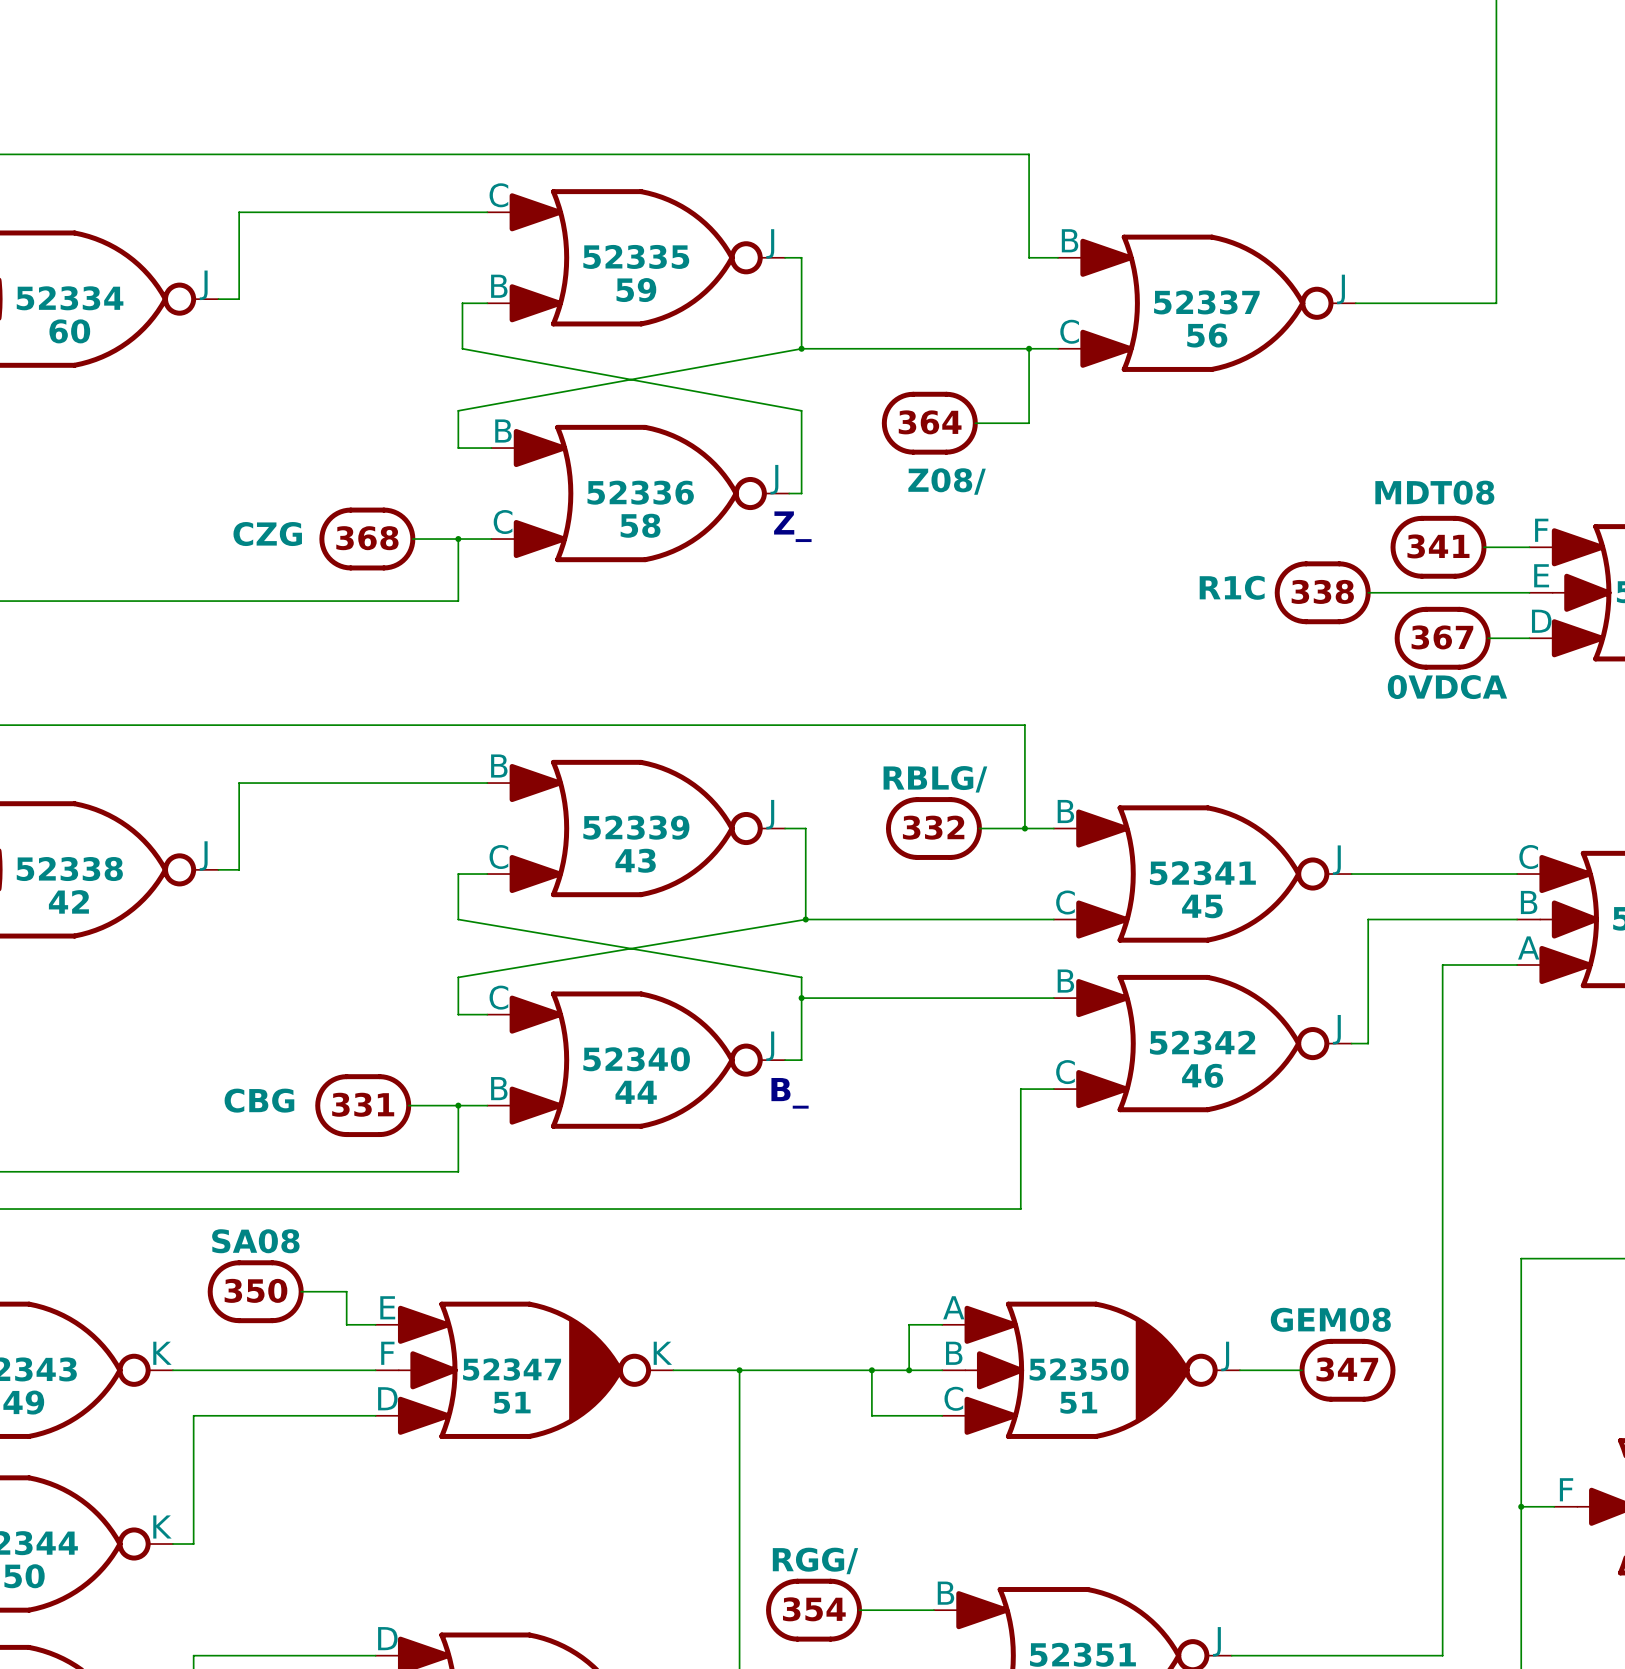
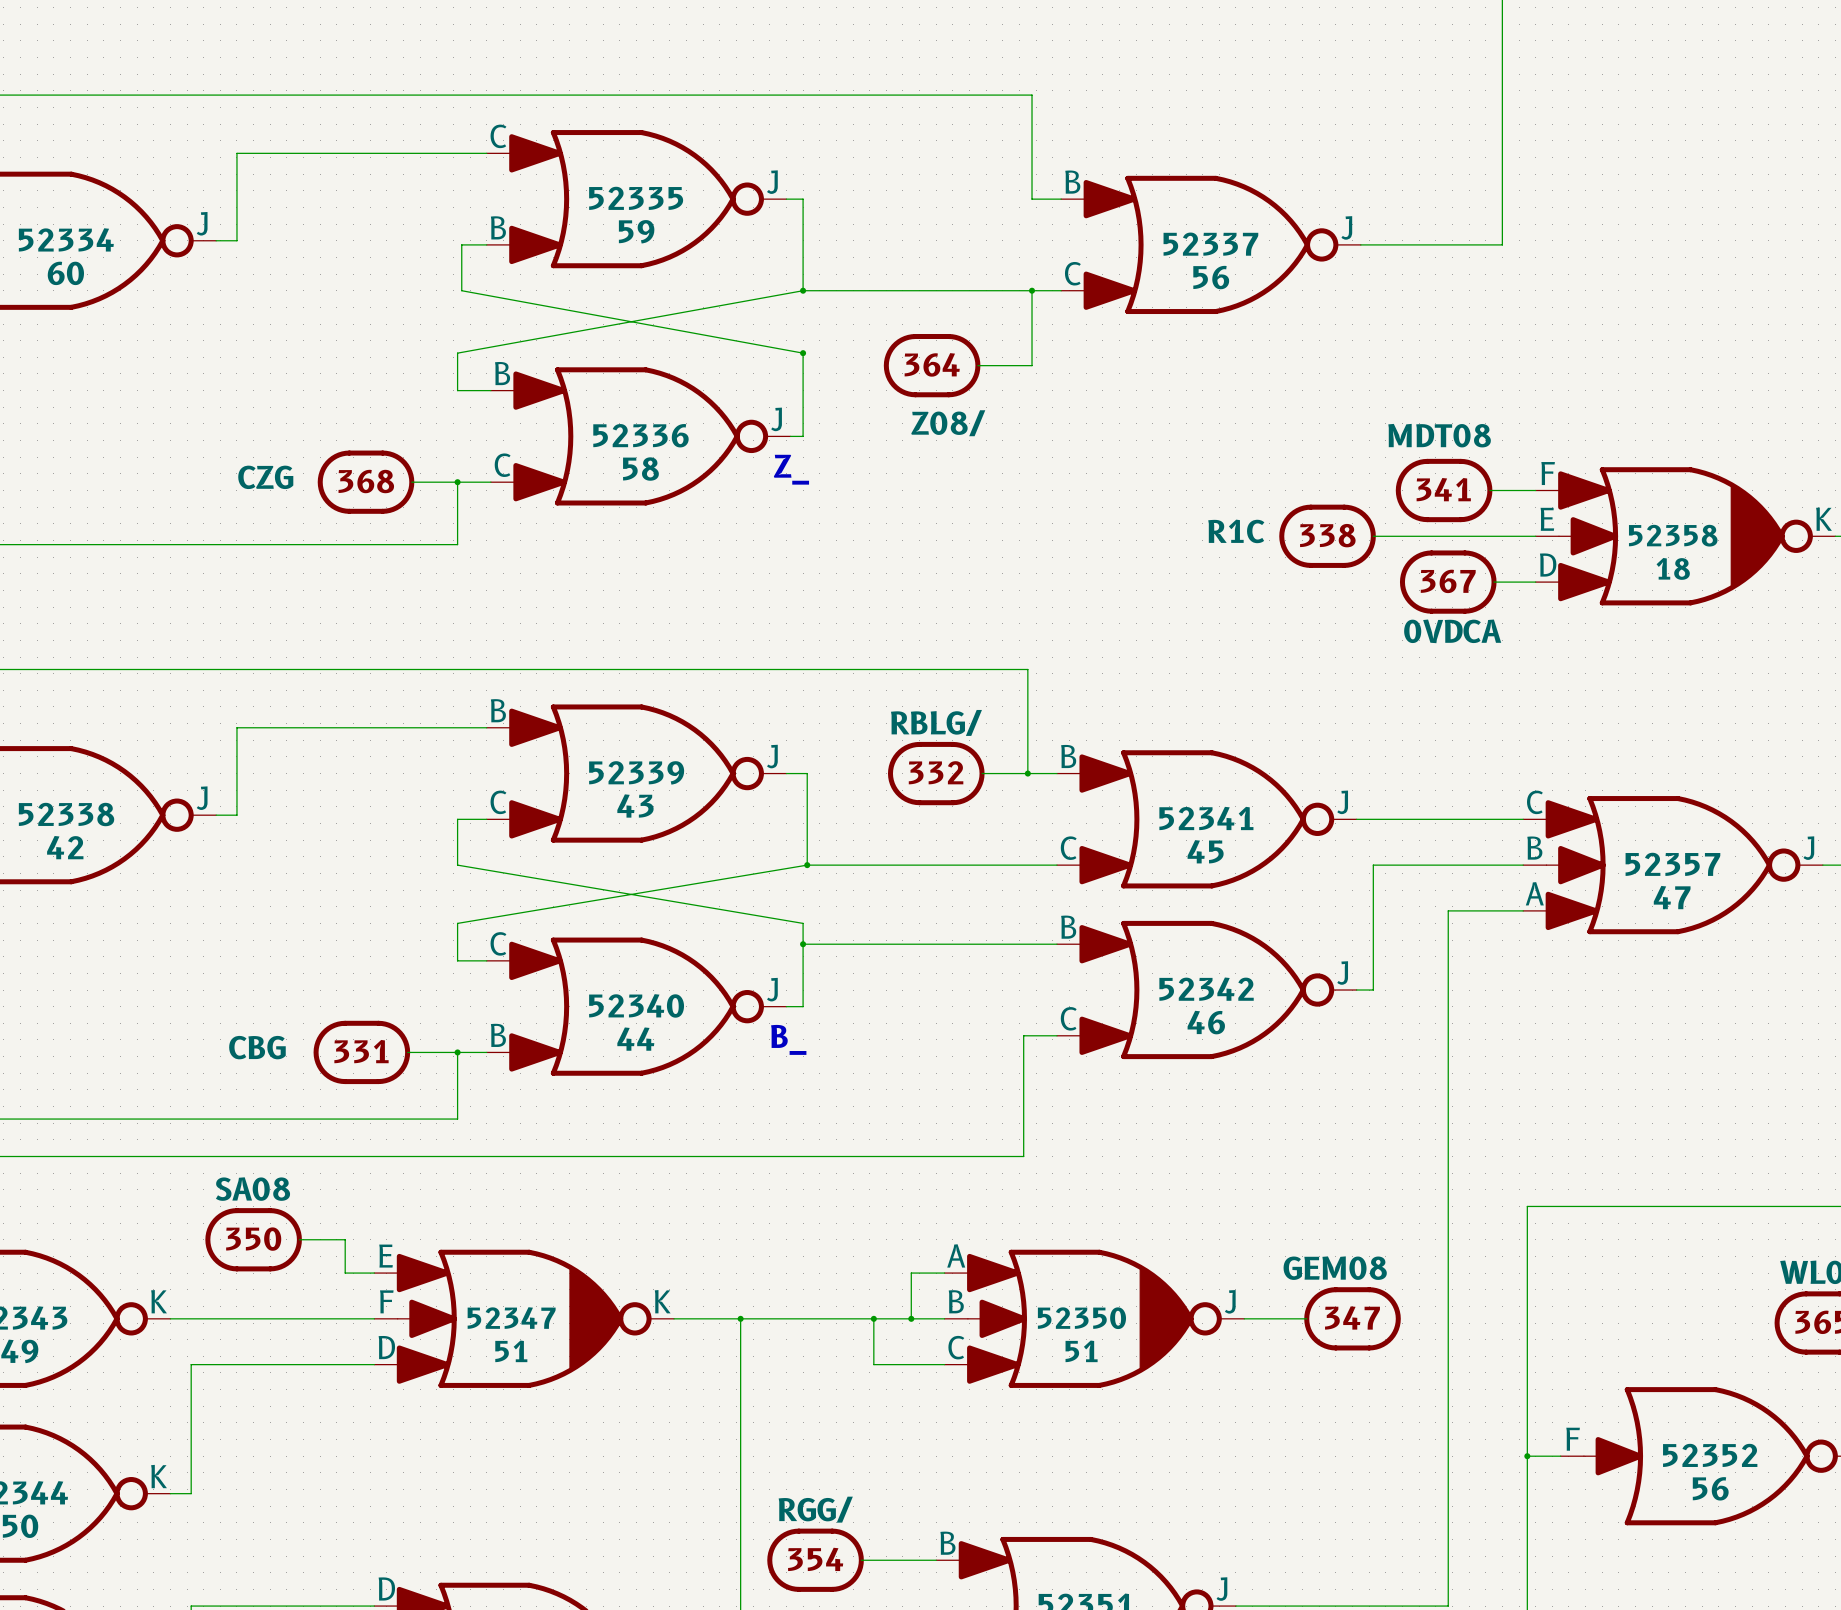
junction: none -> (803, 353)

